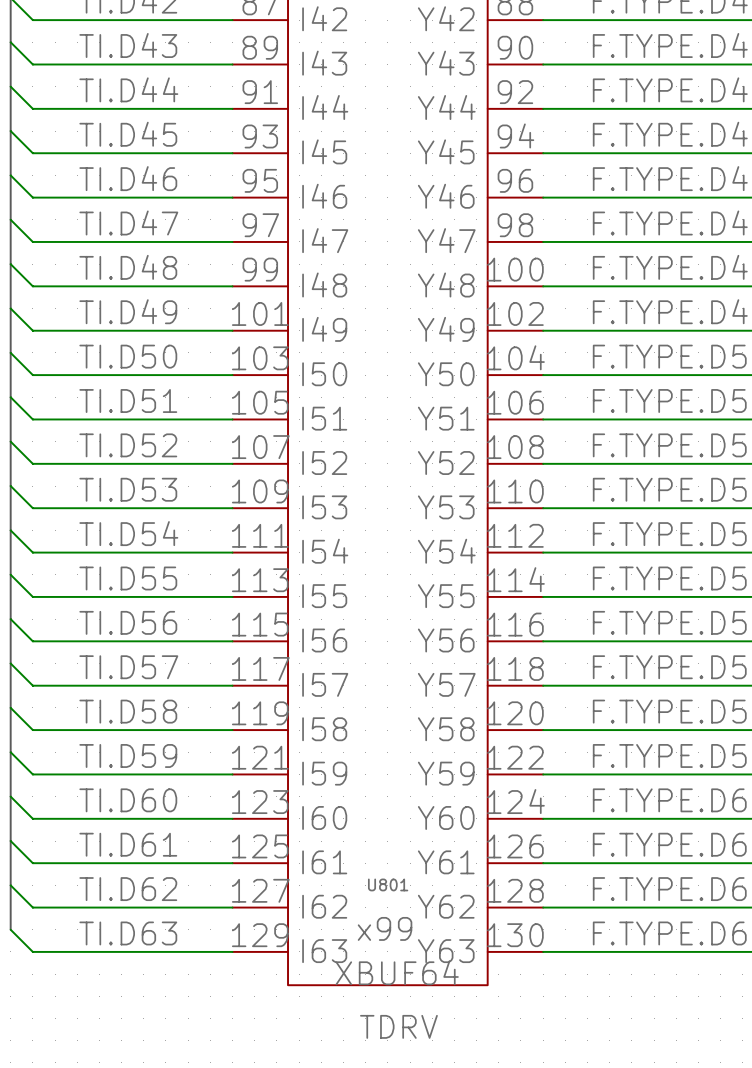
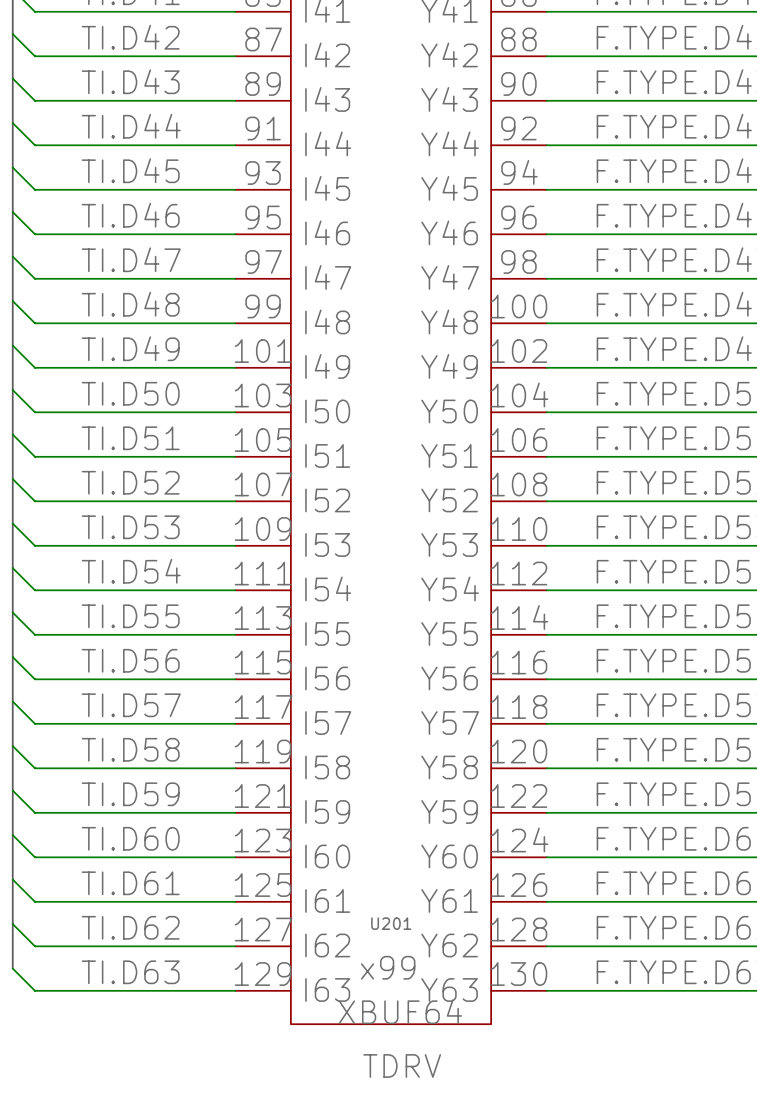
U801 name: U801 (388, 884) -> U201 (391, 923)

